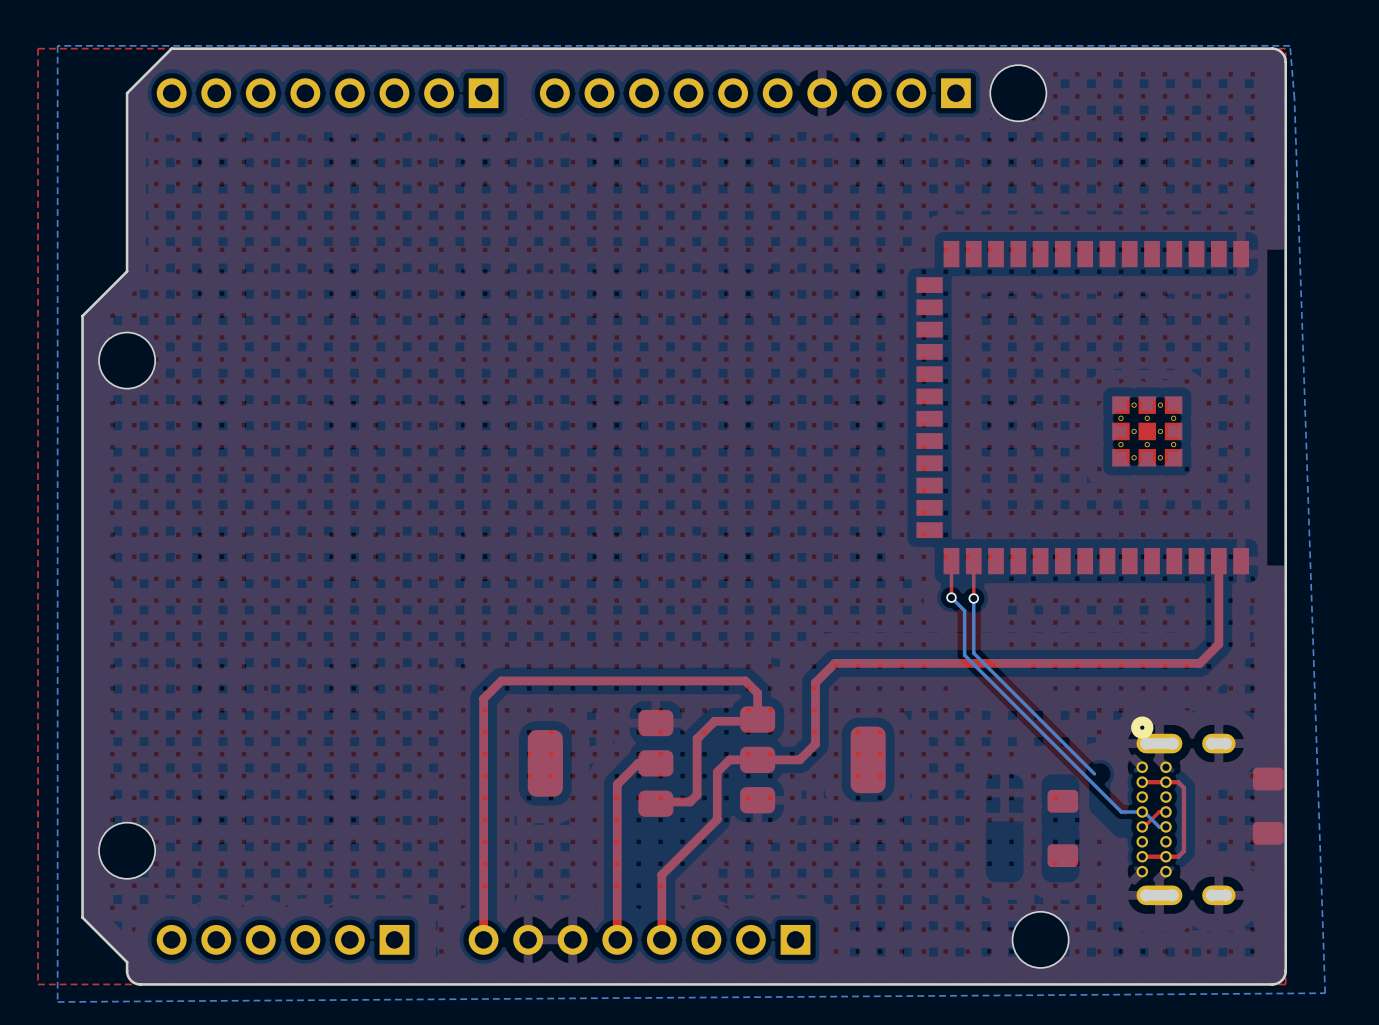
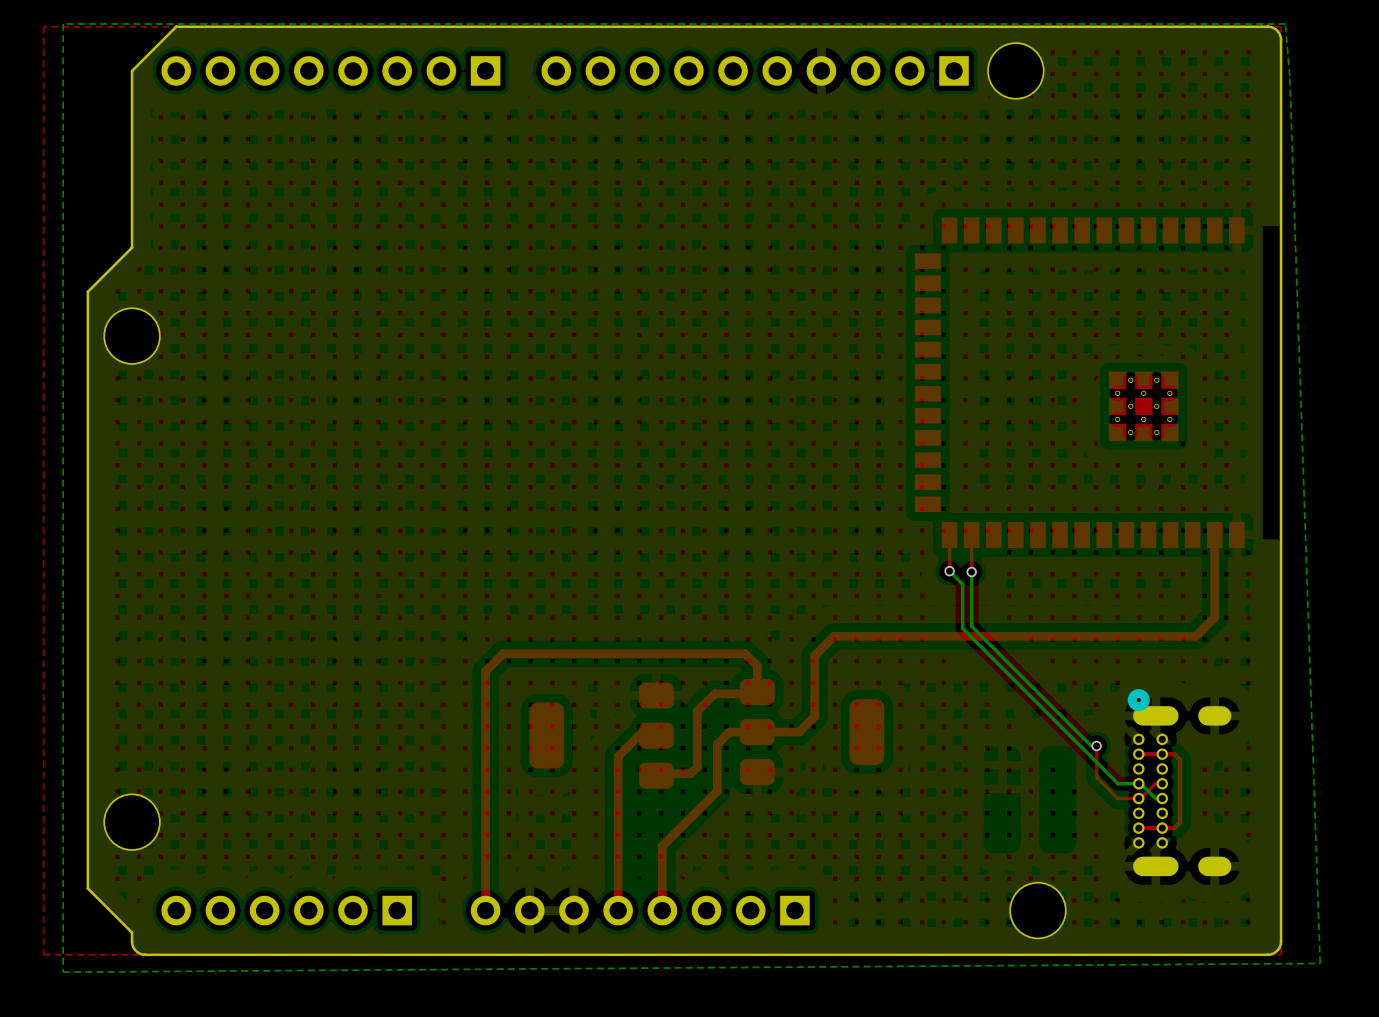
top track: none -> (1096, 745) (1096, 777) (1117, 798) (1138, 798)
via: none -> (1096, 745)
part: (1268, 806) -> none
part: (1062, 828) -> none

